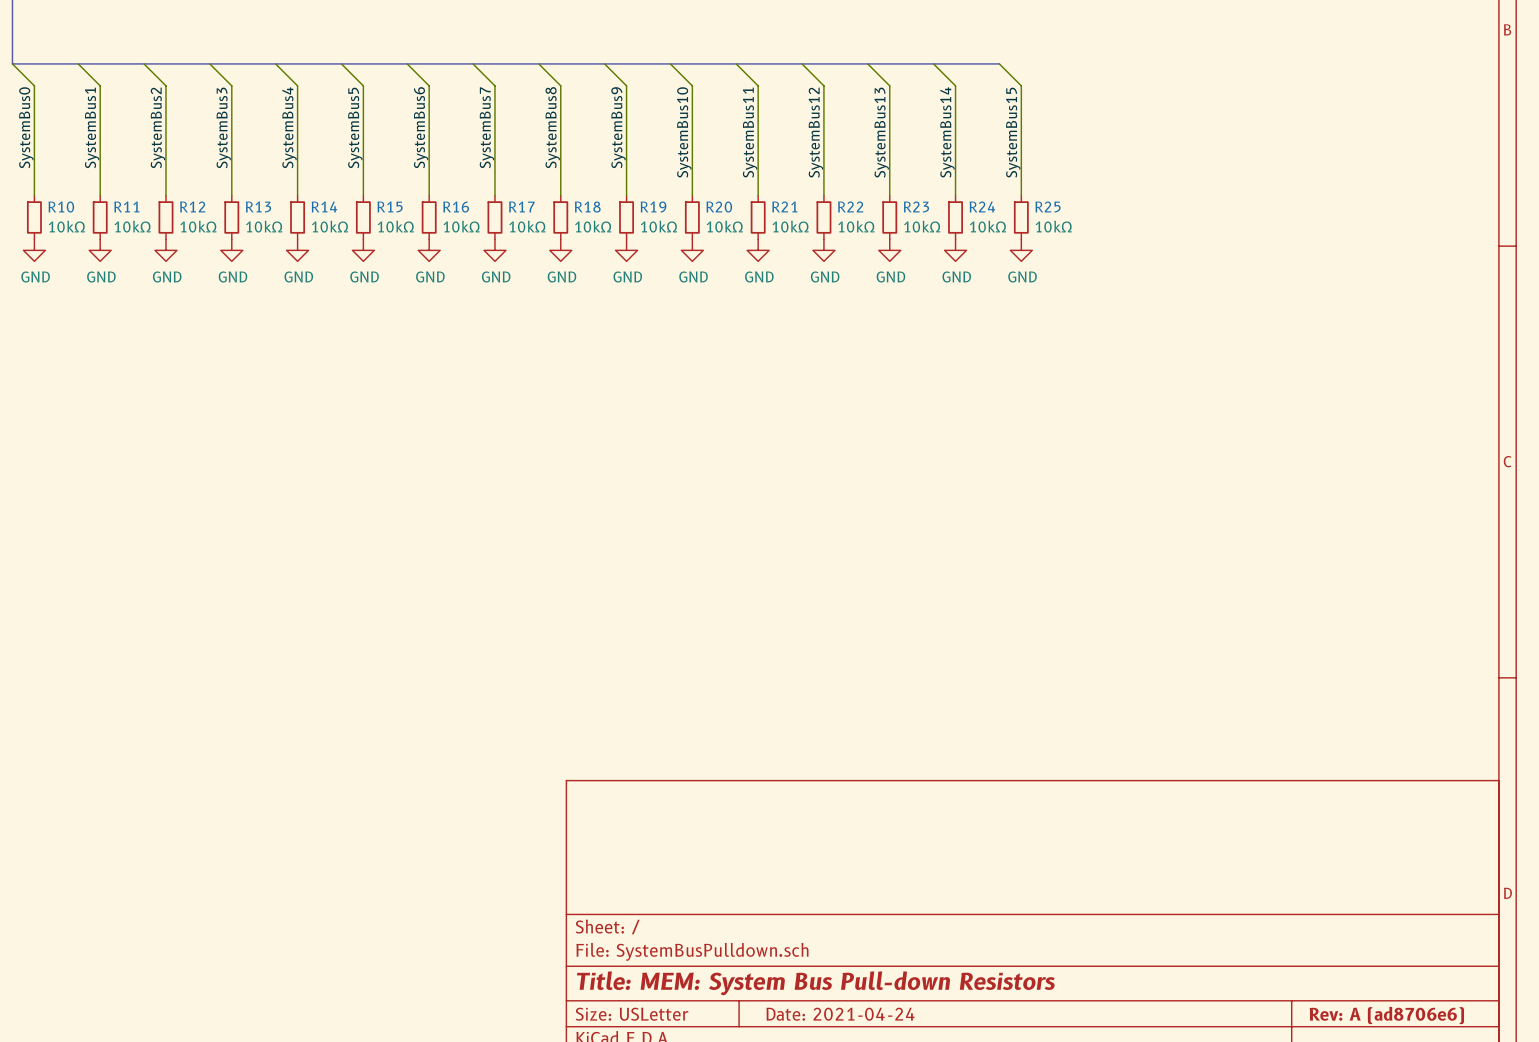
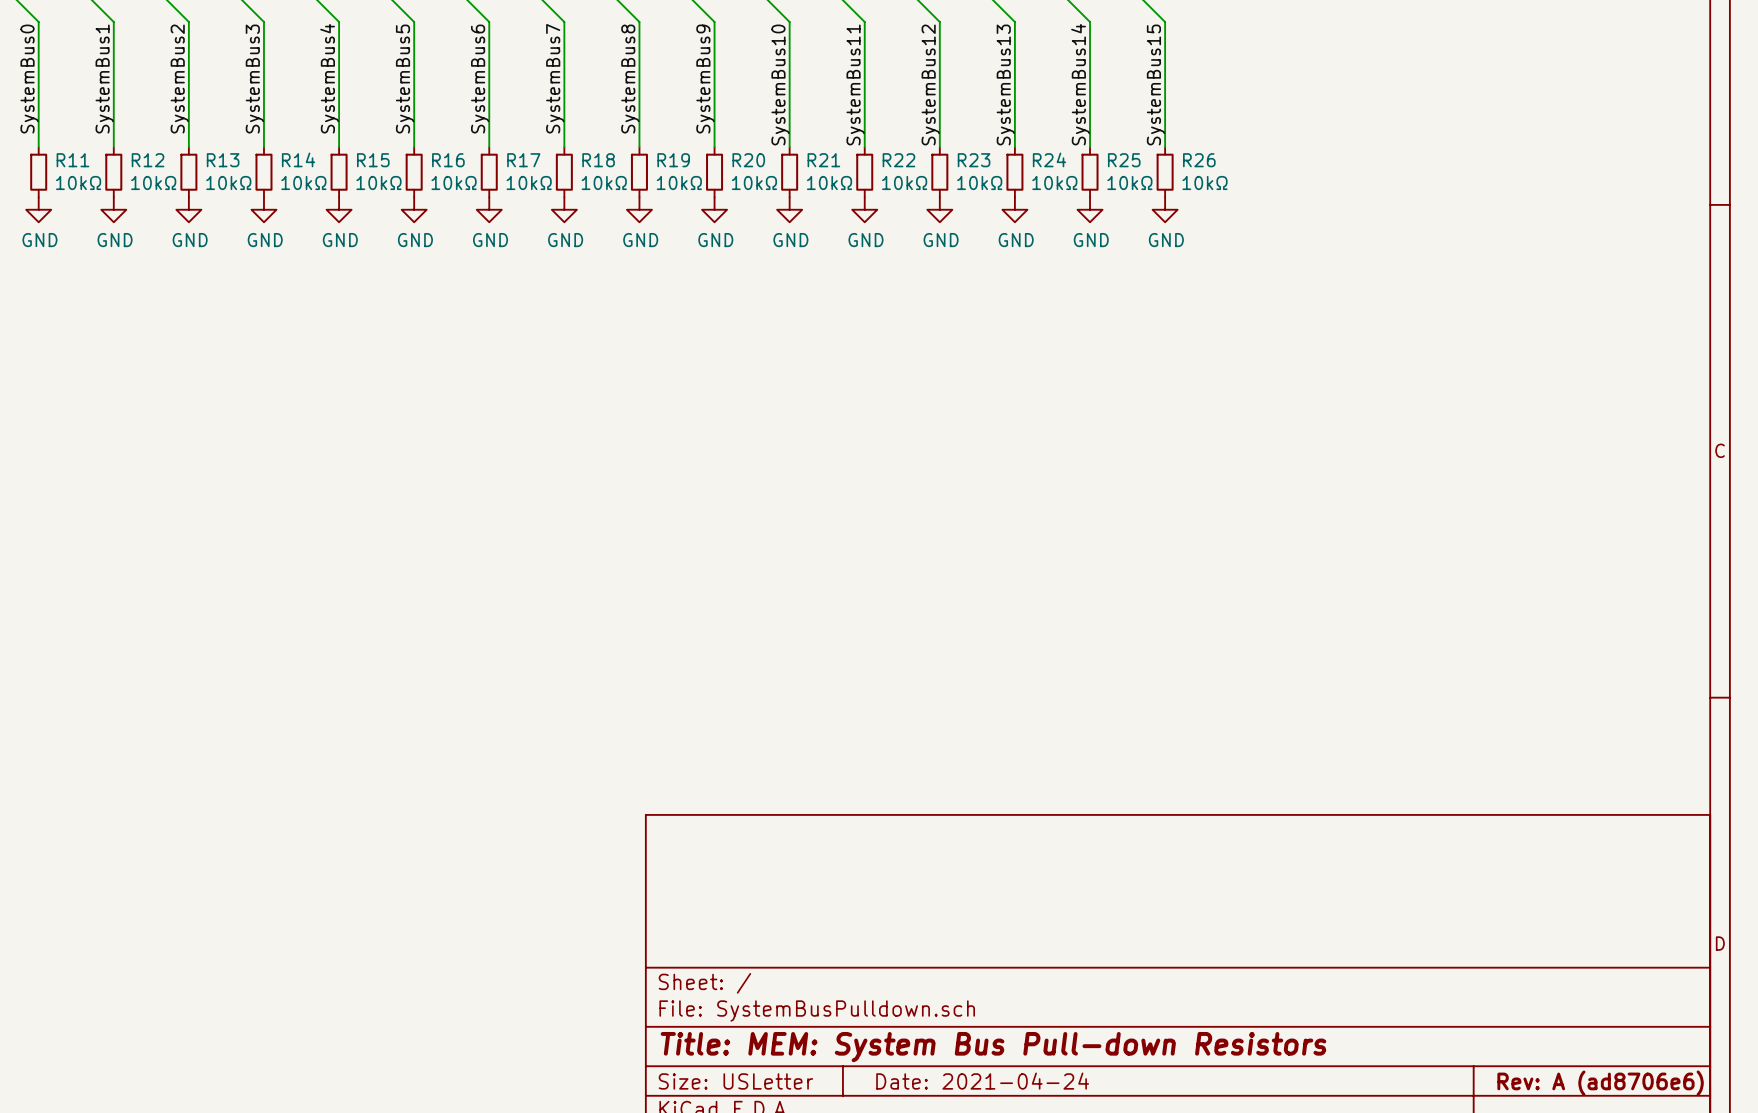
R11 name: R11 (126, 206) -> R12 (148, 160)
R12 name: R12 (192, 206) -> R13 (223, 160)
R13 name: R13 (258, 206) -> R14 (298, 159)
R14 name: R14 (324, 206) -> R15 (373, 160)
R15 name: R15 (390, 206) -> R16 (448, 160)
R17 name: R17 (521, 206) -> R18 (598, 160)
R21 name: R21 (784, 206) -> R22 (898, 160)
R22 name: R22 (850, 206) -> R23 (974, 160)
R23 name: R23 (916, 206) -> R24 (1049, 159)
R24 name: R24 (982, 206) -> R25 (1124, 160)
R25 name: R25 (1048, 206) -> R26 (1199, 160)
R10 name: R10 (61, 207) -> R11 (72, 160)
R16 name: R16 (456, 207) -> R17 (523, 160)
R18 name: R18 (587, 207) -> R19 (673, 160)
R19 name: R19 (653, 207) -> R20 (748, 160)
R20 name: R20 (719, 207) -> R21 (823, 160)

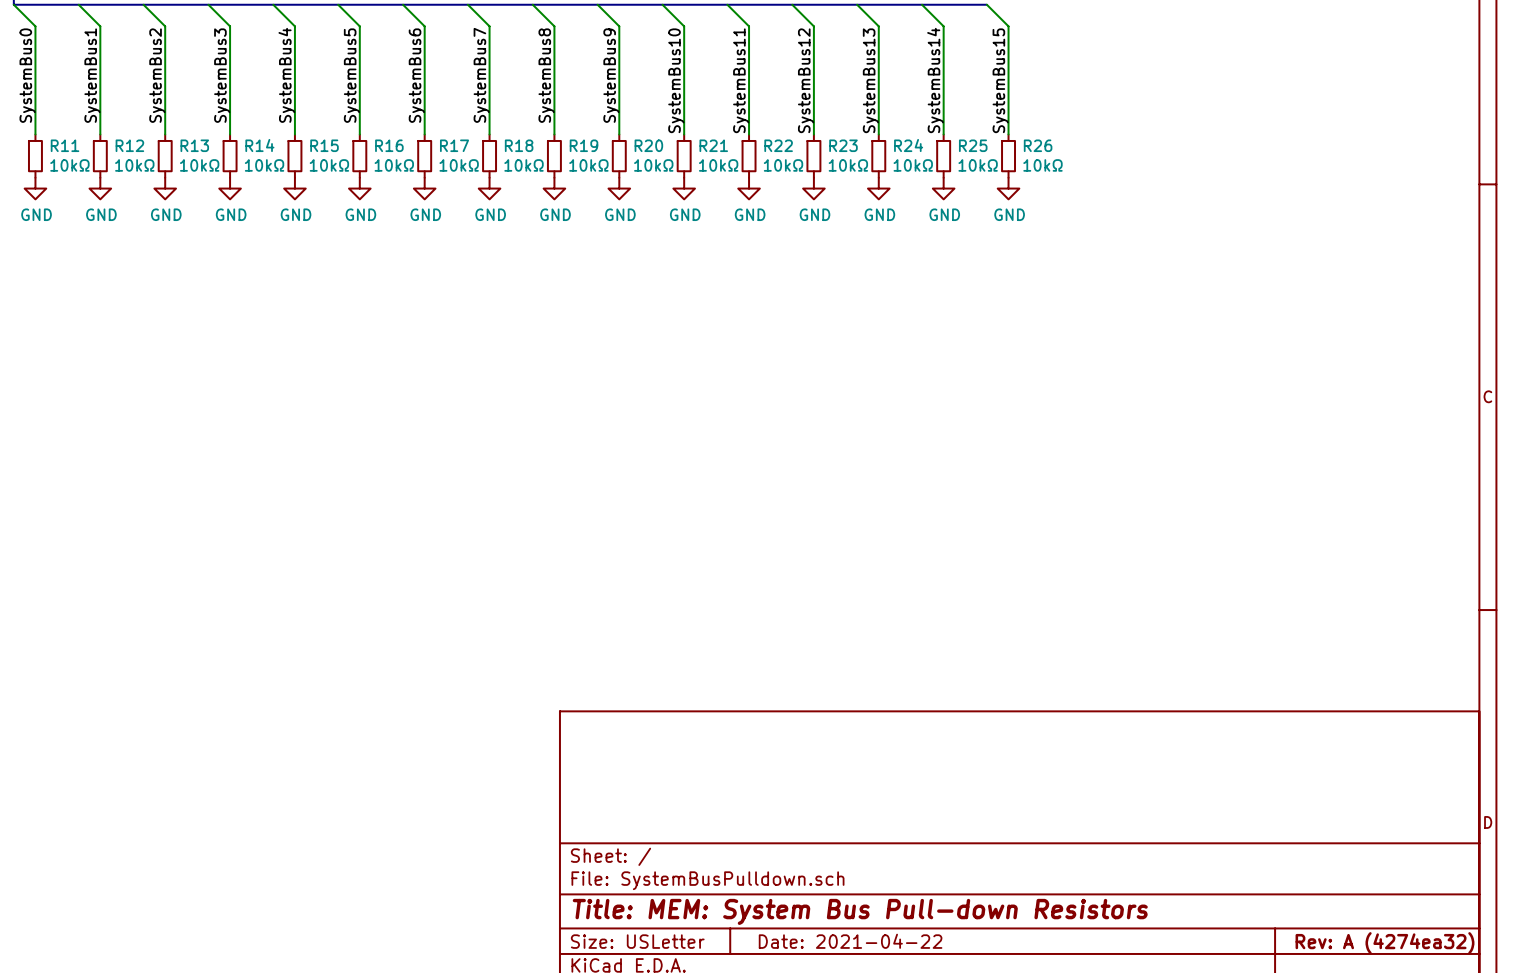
title block: Date: 2021-04-24 (982, 1081) -> Date: 2021-04-22 (850, 941)
title block: Rev: A (ad8706e6) (1600, 1083) -> Rev: A (4274ea32) (1384, 943)

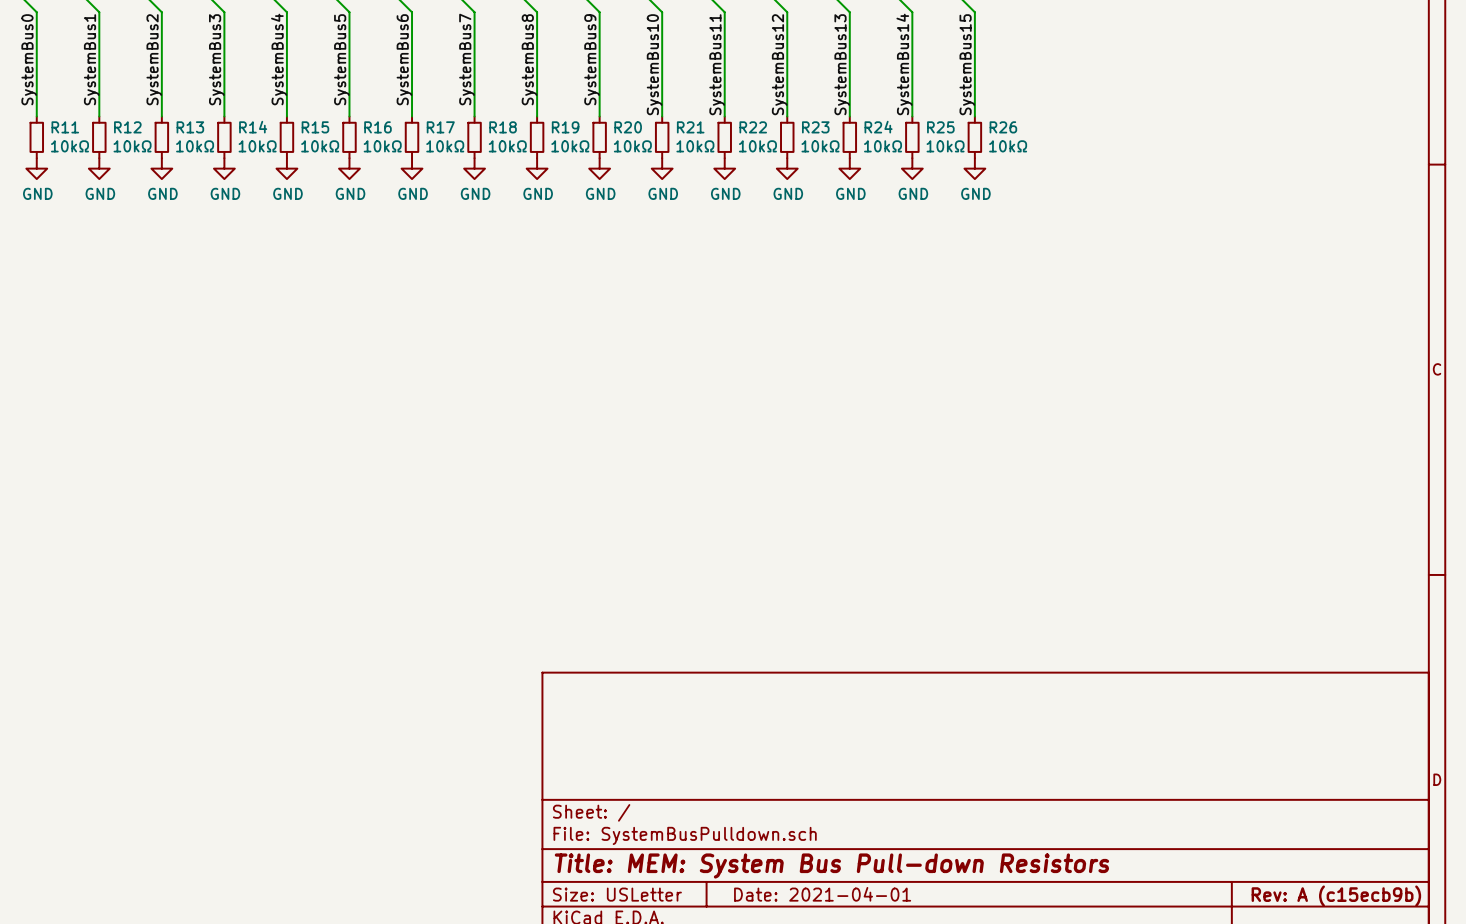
title block: Date: 2021-04-22 (850, 941) -> Date: 2021-04-01 (822, 894)
title block: Rev: A (4274ea32) (1384, 943) -> Rev: A (c15ecb9b) (1336, 896)

